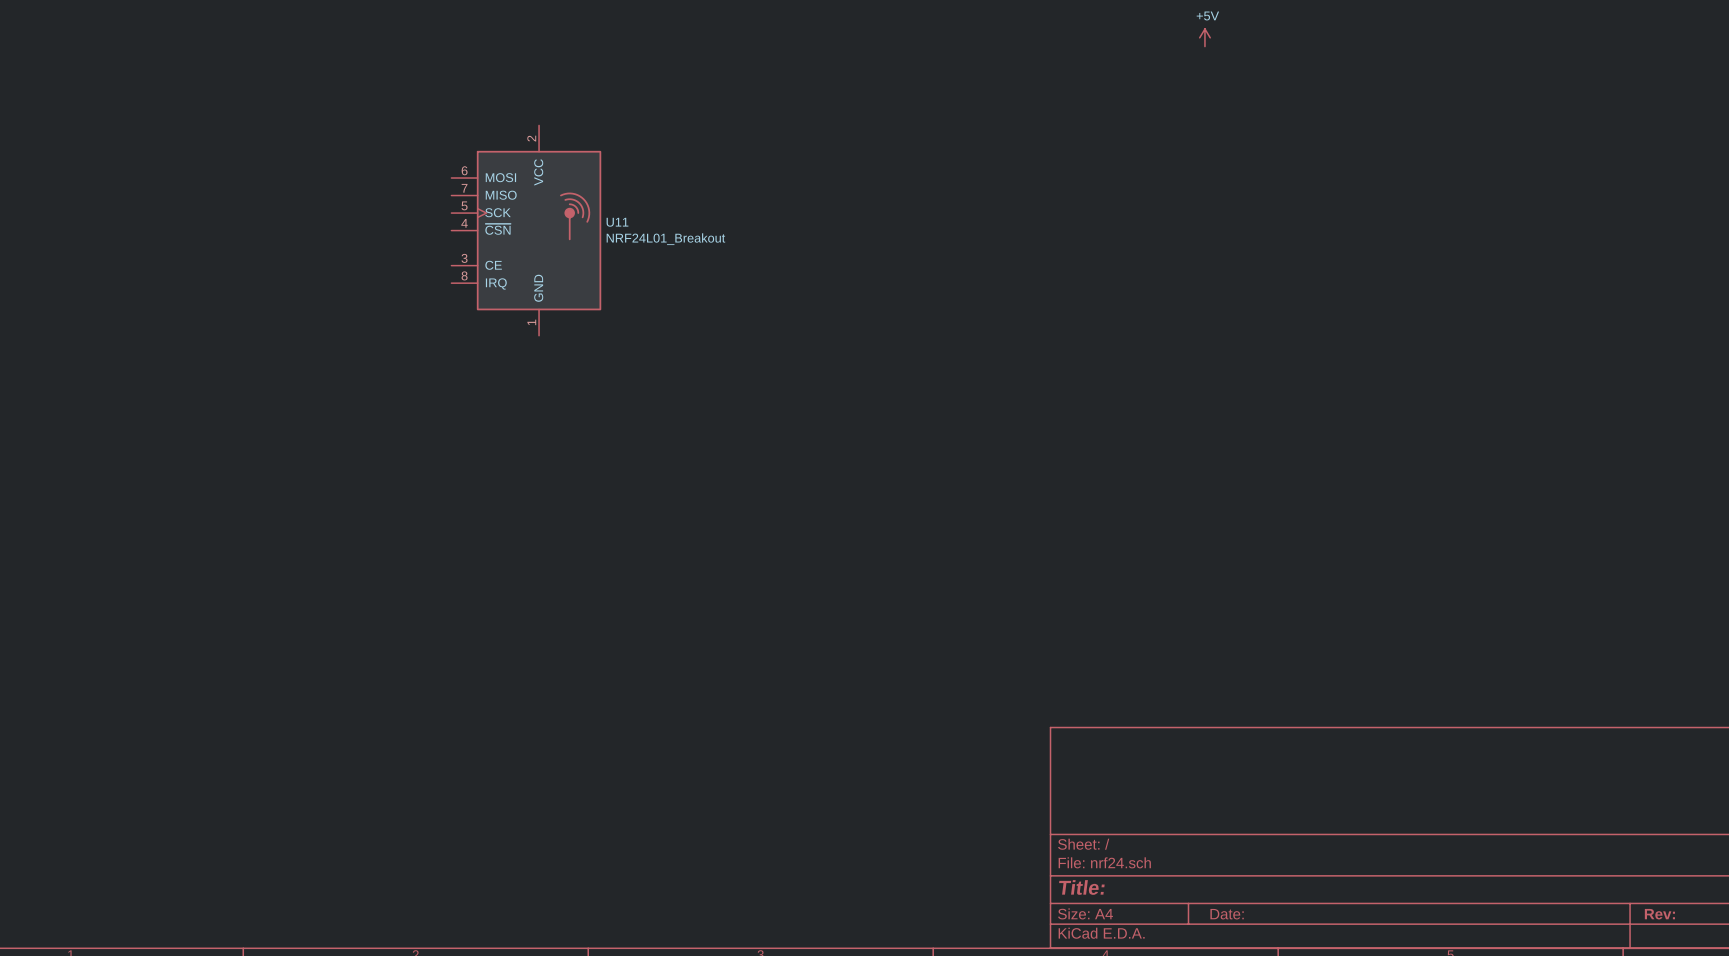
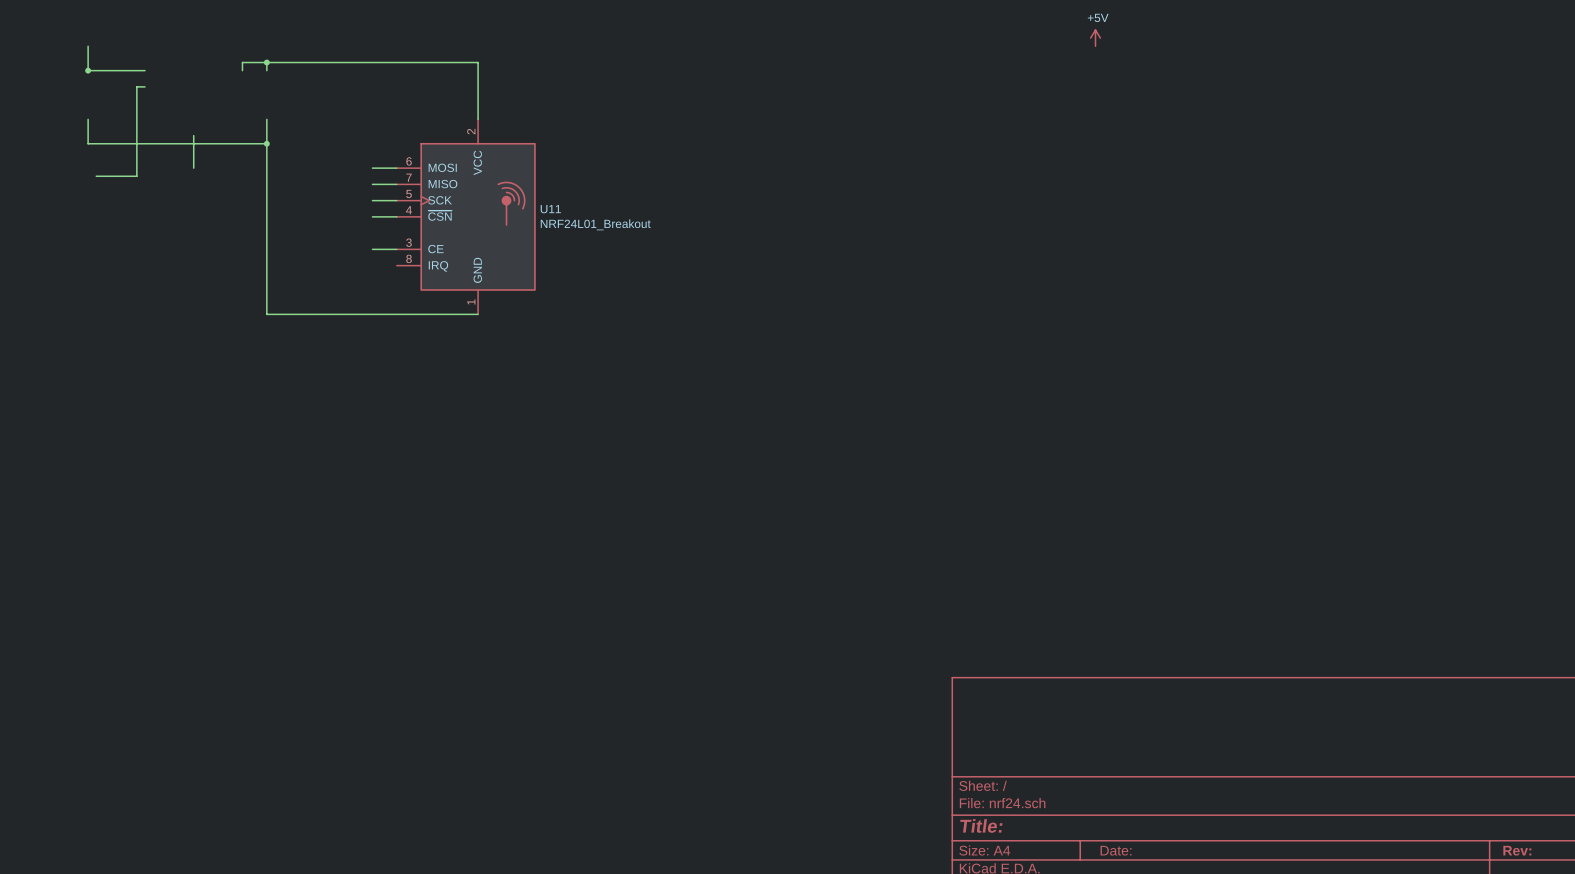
wire: none -> (88, 46) (88, 70) (144, 70)
wire: none -> (266, 62) (266, 70)
junction: none -> (266, 62)
junction: none -> (88, 70)
wire: none -> (242, 70) (242, 62) (478, 62) (478, 119)
wire: none -> (144, 86) (136, 86) (136, 176) (96, 176)
wire: none -> (88, 119) (88, 143) (266, 143)
wire: none -> (266, 119) (266, 314) (478, 314)
wire: none -> (193, 135) (193, 168)
junction: none -> (266, 143)
wire: none -> (372, 168) (396, 168)
wire: none -> (372, 184) (396, 184)
wire: none -> (372, 200) (396, 200)
wire: none -> (372, 216) (396, 216)
wire: none -> (372, 249) (396, 249)

